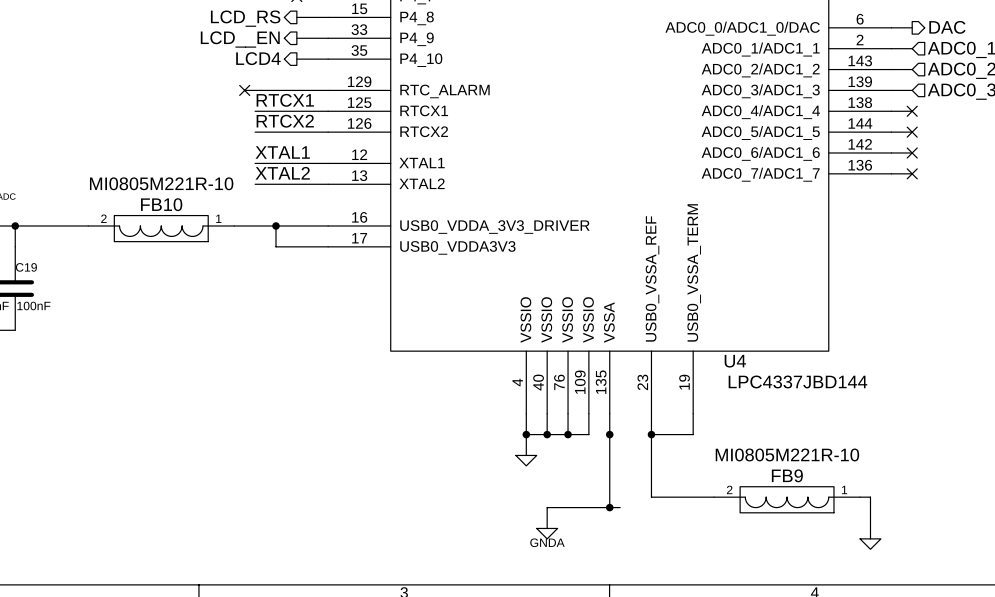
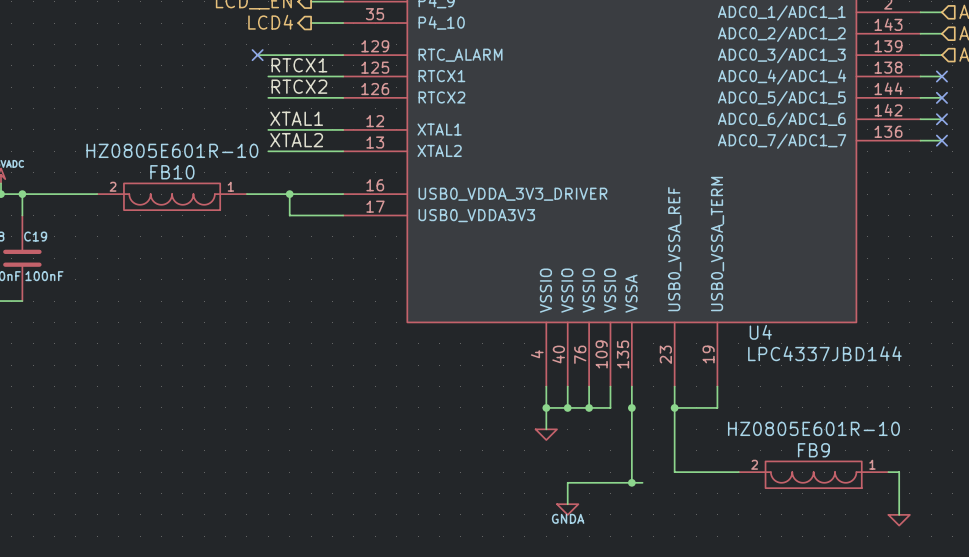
FB10 value: MI0805M221R-10 (161, 183) -> HZ0805E601R-10 (172, 150)
FB9 value: MI0805M221R-10 (787, 454) -> HZ0805E601R-10 (813, 428)

